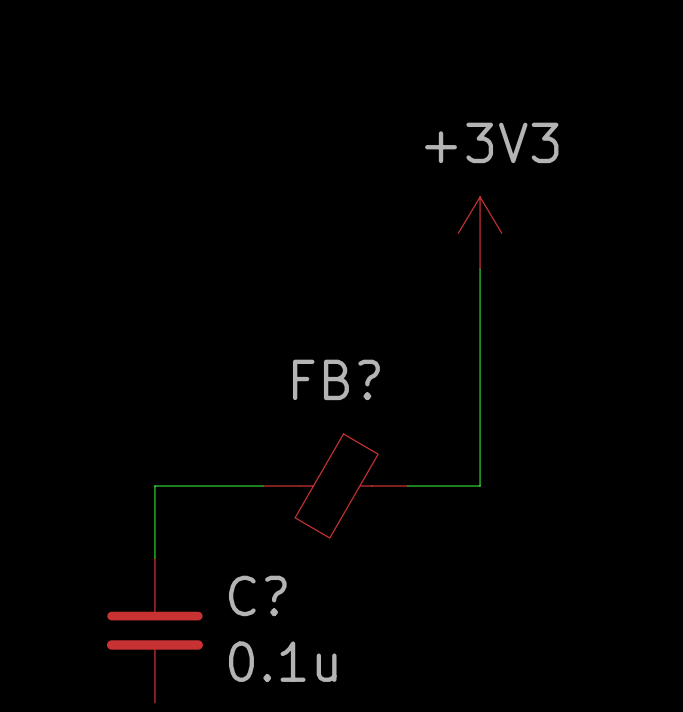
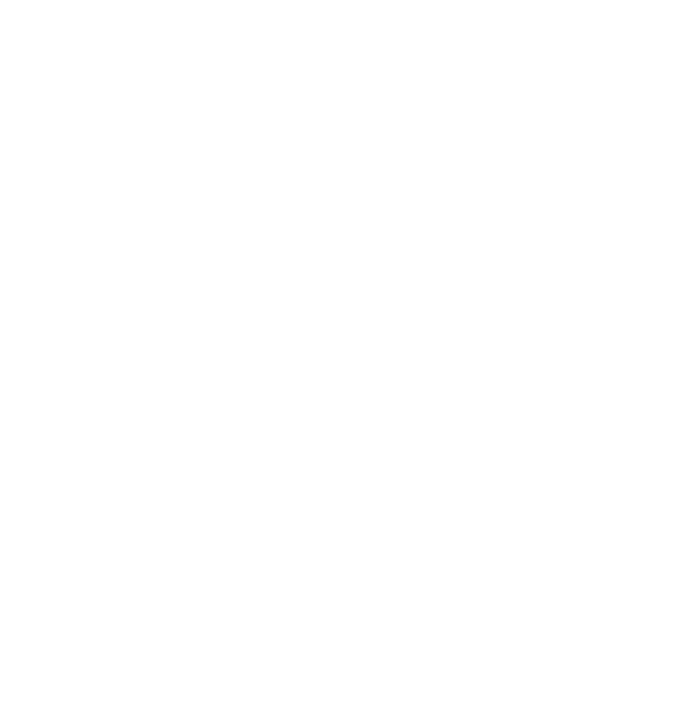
power symbol: +3V3 (480, 233) -> none
wire: (480, 269) (480, 486) (407, 486) -> none
wire: (263, 486) (154, 486) (154, 558) -> none
FB?: (335, 486) -> none
C?: 0.1u (154, 630) -> none

